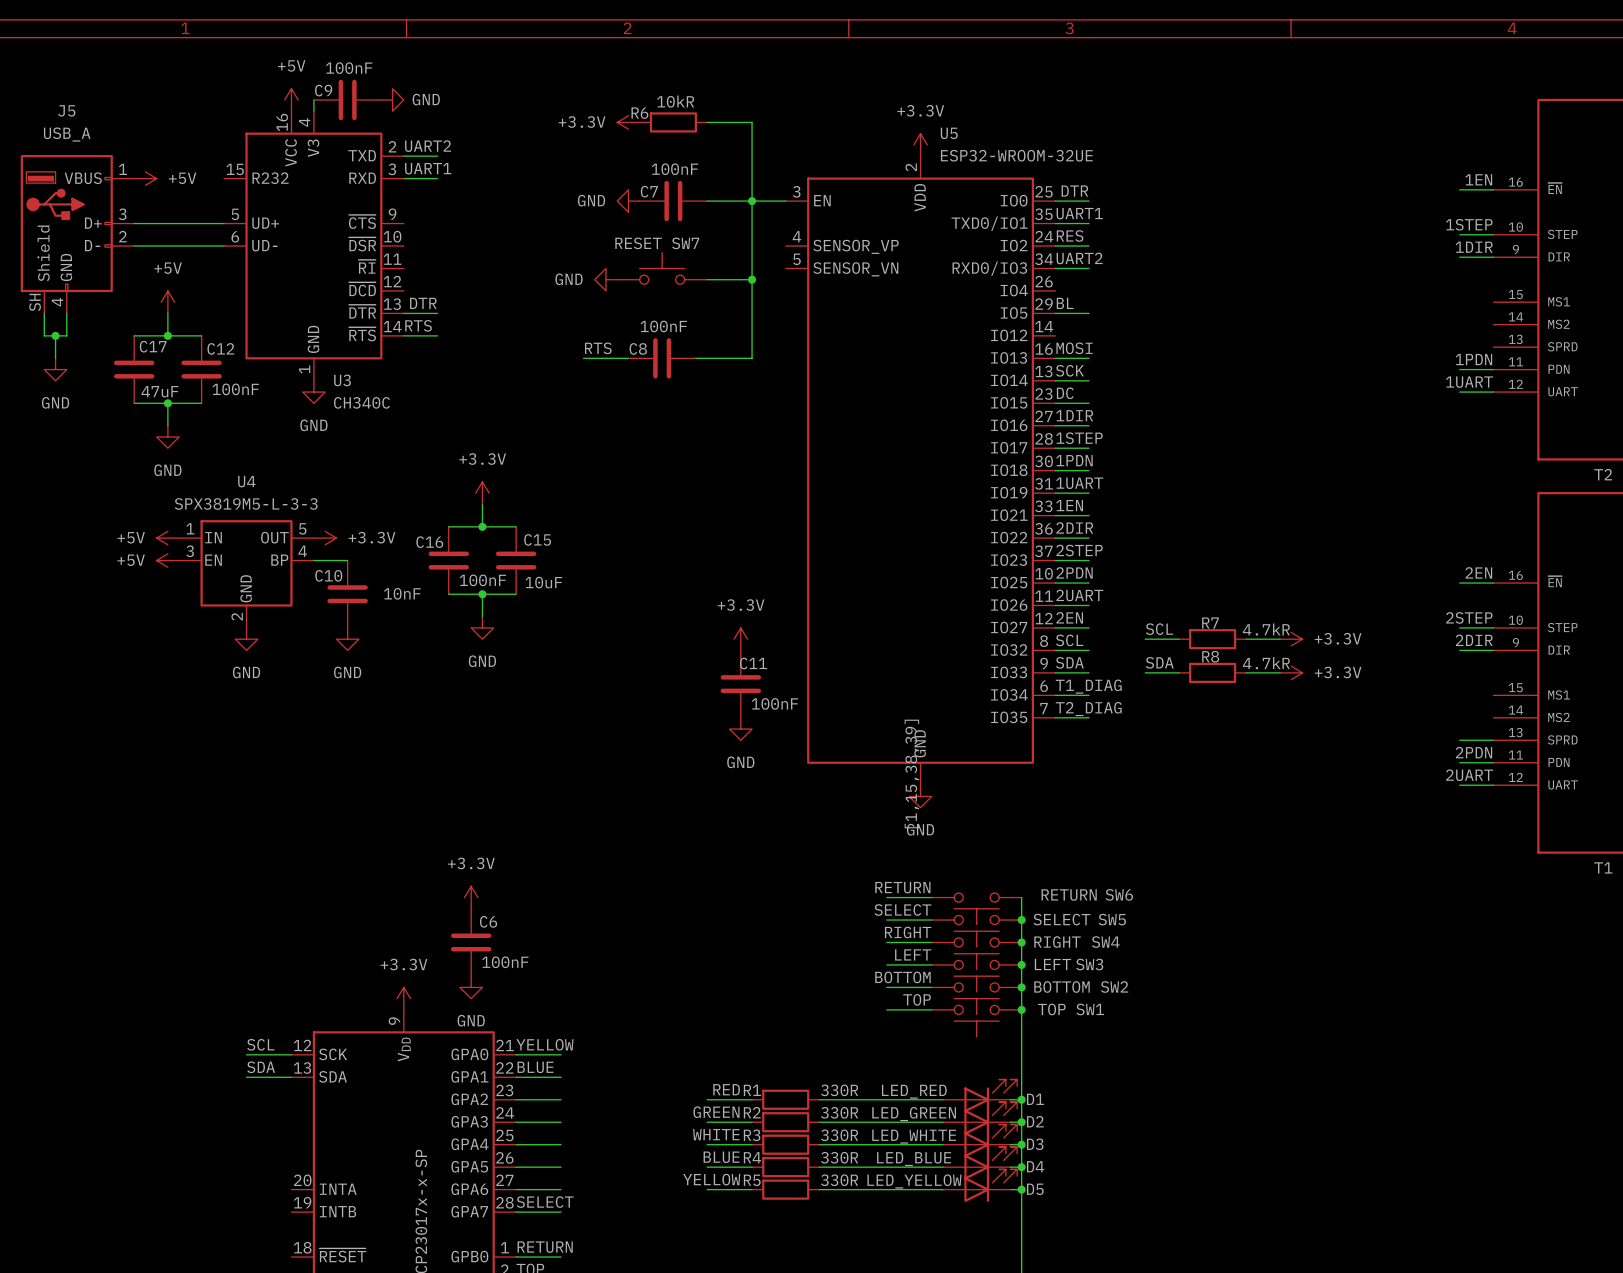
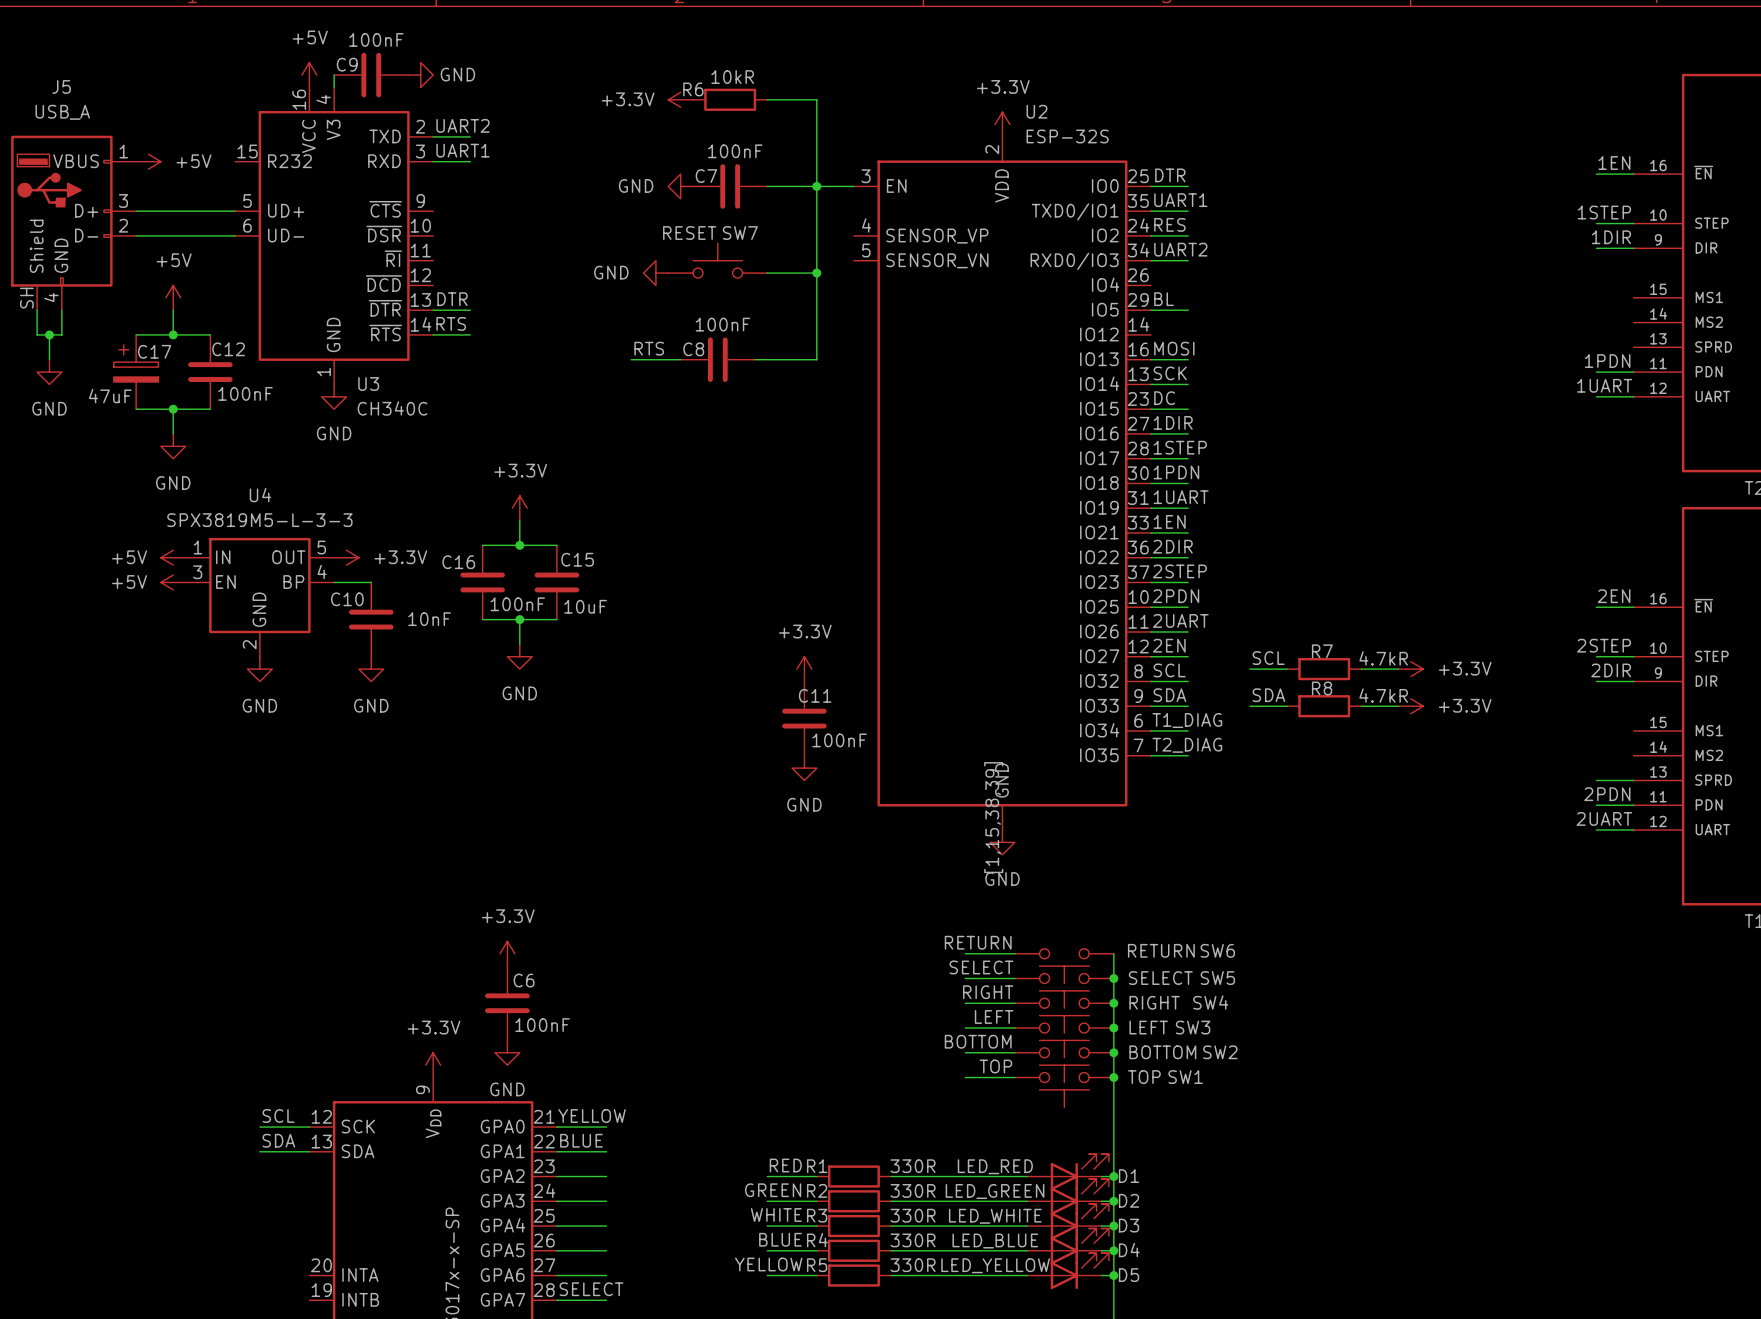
U5 name: U5 (949, 133) -> U2 (1036, 111)
U5 value: ESP32-WROOM-32UE (1016, 155) -> ESP-32S (1067, 136)
C17 symbol: [113, 335, 155, 404] -> [113, 334, 159, 410]
C17 value position: 47uF (159, 391) -> 47uF (110, 396)

